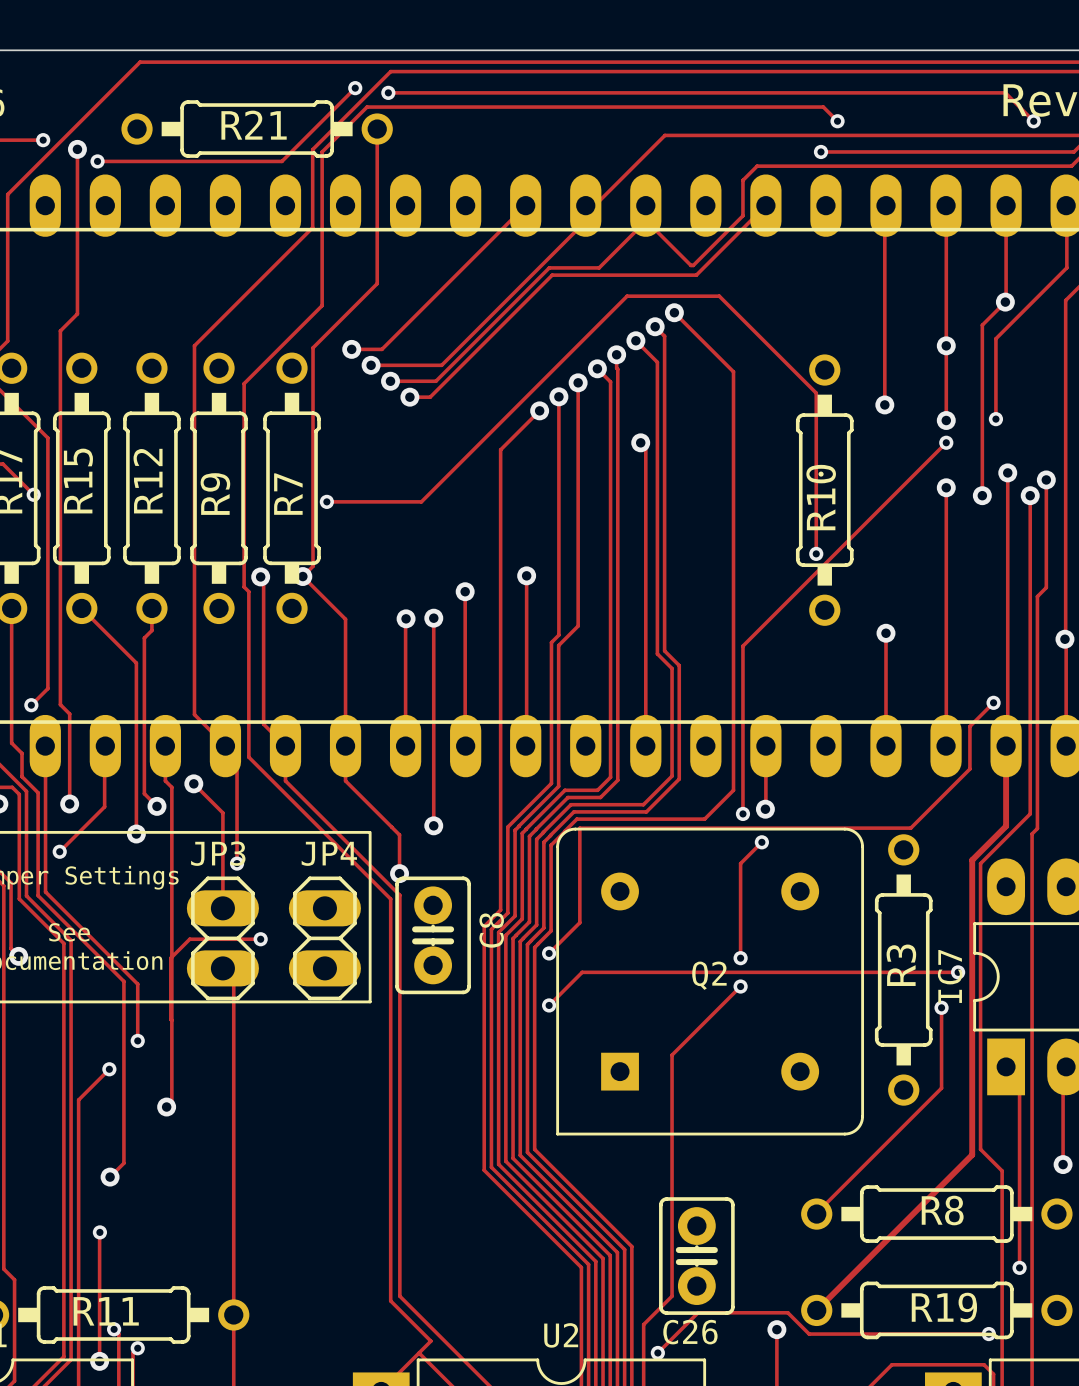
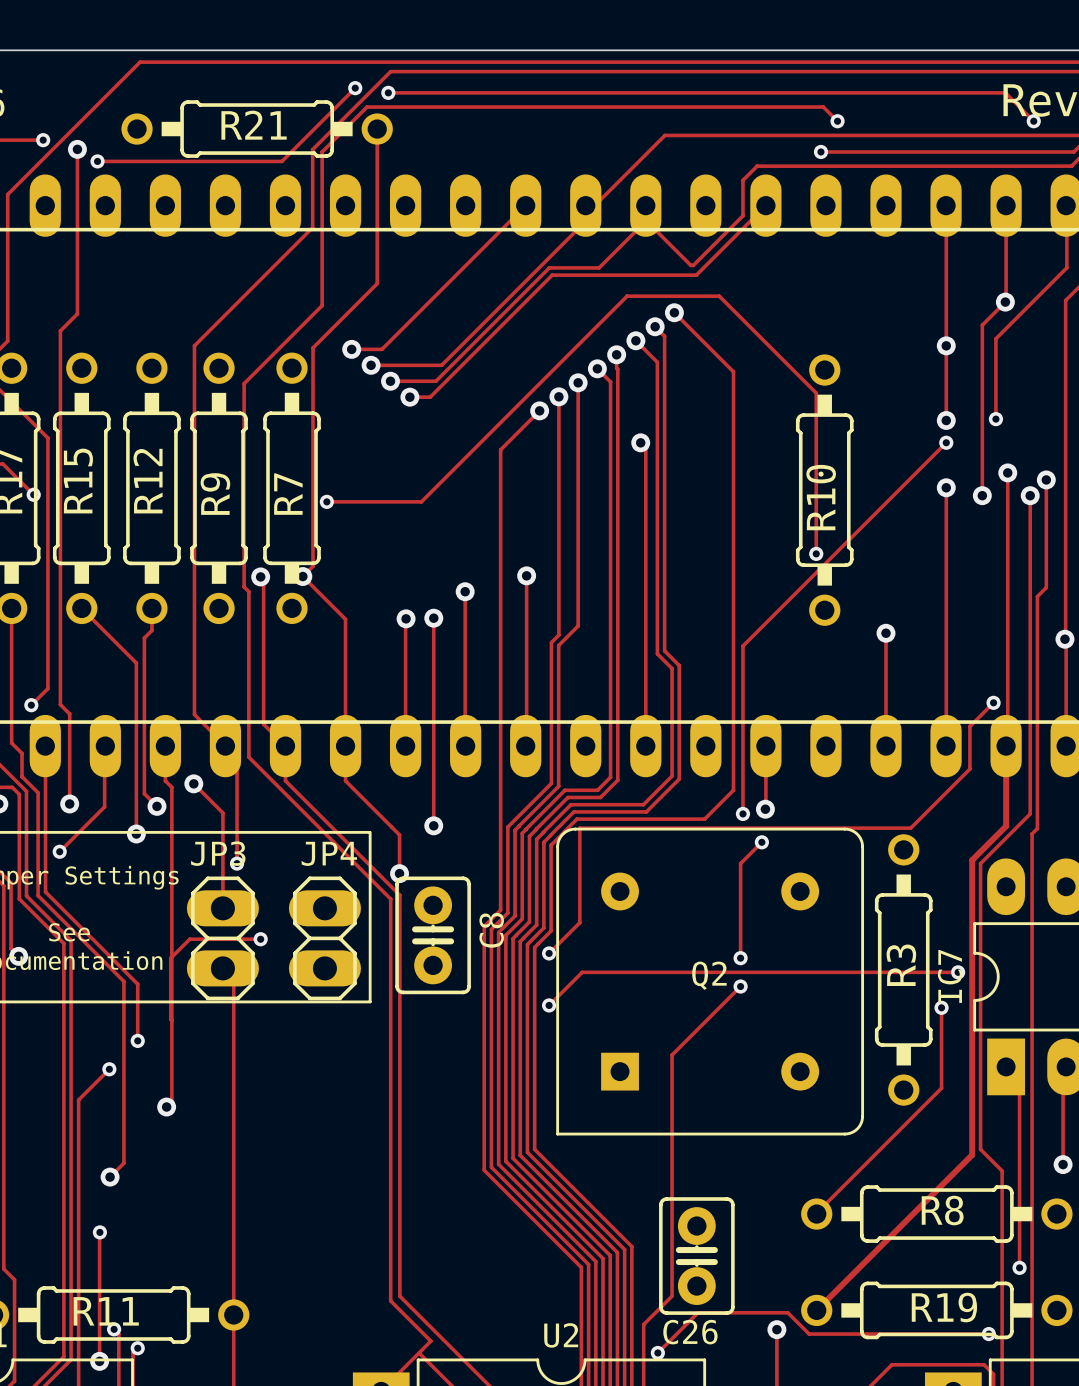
track: (884, 206) (884, 404) -> none
via: (884, 404) -> none

